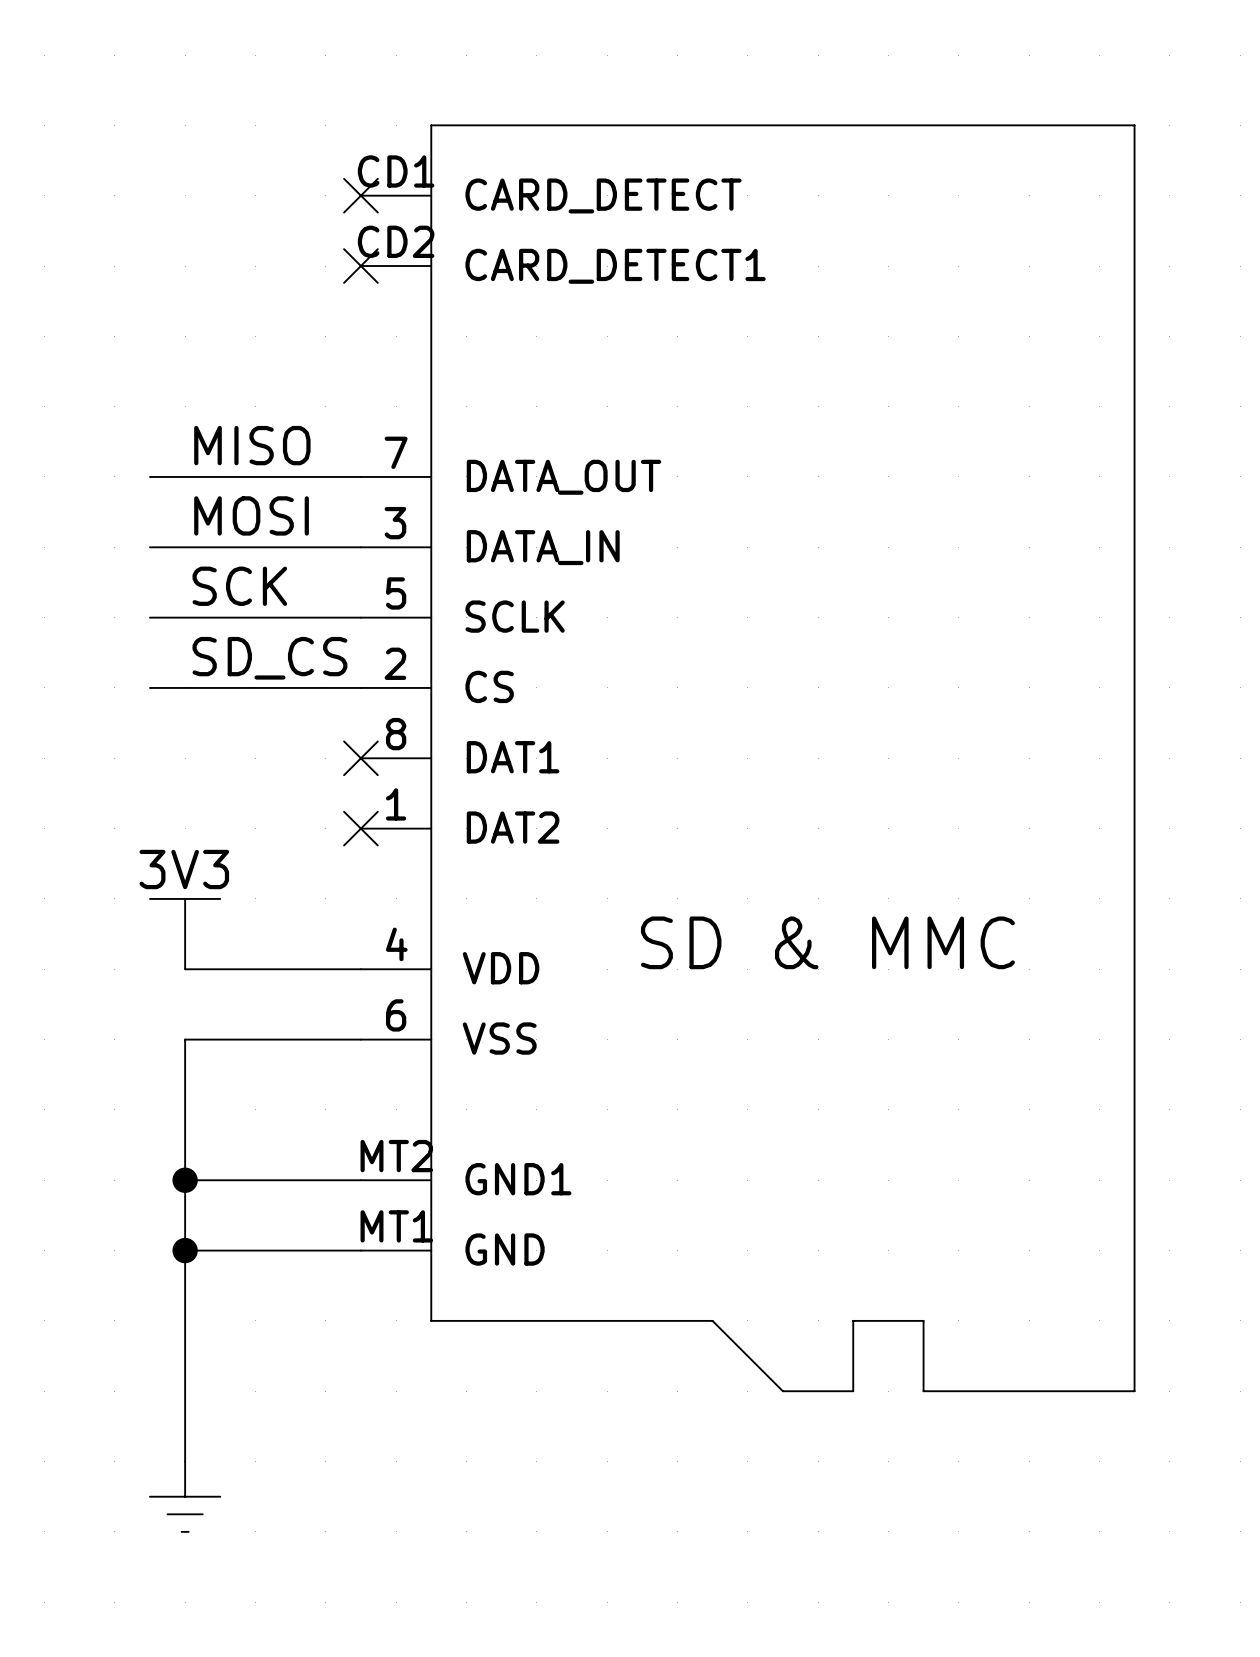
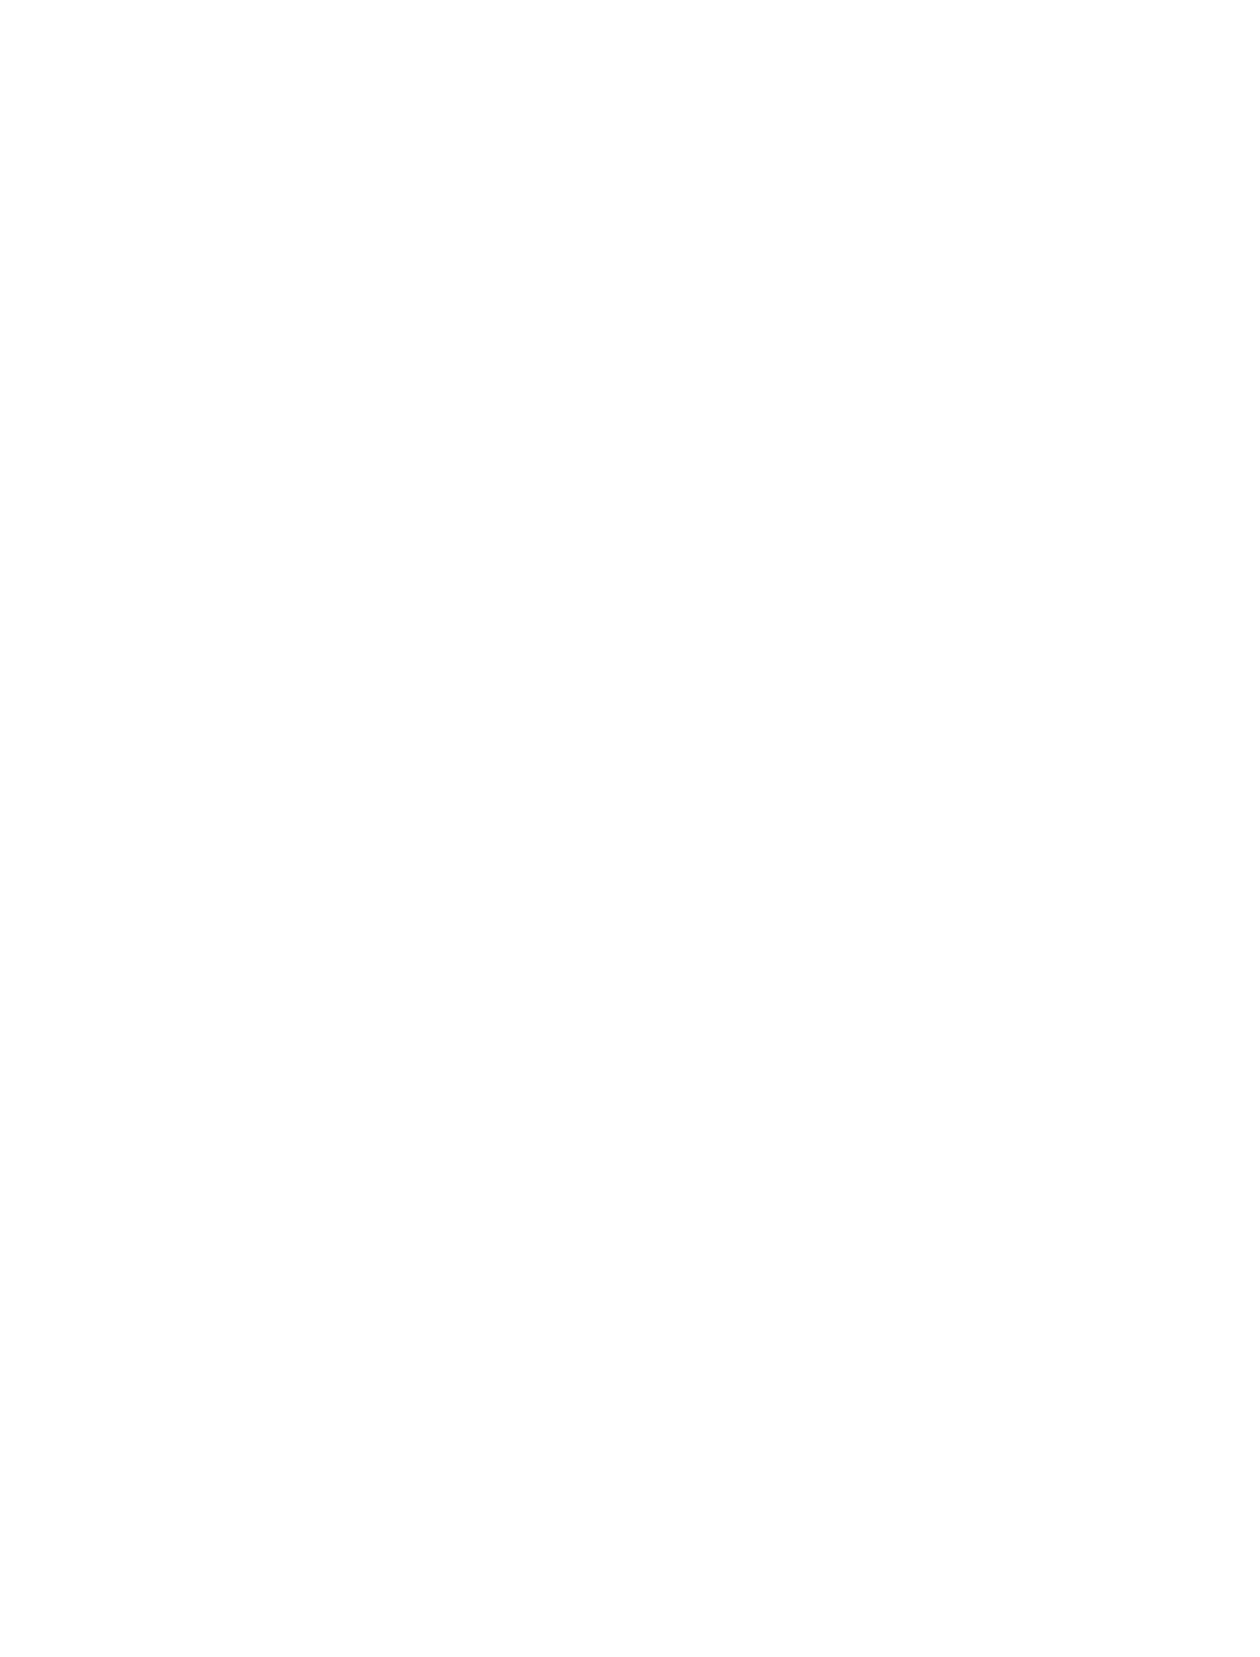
no-connect mark: (360, 195) -> none
no-connect mark: (360, 266) -> none
label: MISO (252, 445) -> none
wire: (149, 476) (360, 476) -> none
label: MOSI (251, 515) -> none
wire: (149, 547) (360, 547) -> none
label: SCK (239, 586) -> none
wire: (149, 617) (360, 617) -> none
label: SD_CS (269, 658) -> none
wire: (149, 687) (360, 687) -> none
no-connect mark: (360, 758) -> none
part: (747, 758) -> none
no-connect mark: (360, 828) -> none
power symbol: 3V3 (185, 934) -> none
wire: (185, 969) (360, 969) -> none
wire: (360, 1039) (185, 1039) (185, 1461) -> none
wire: (185, 1180) (360, 1180) -> none
junction: (185, 1180) -> none
wire: (185, 1250) (360, 1250) -> none
junction: (185, 1250) -> none
power symbol: (185, 1496) -> none

